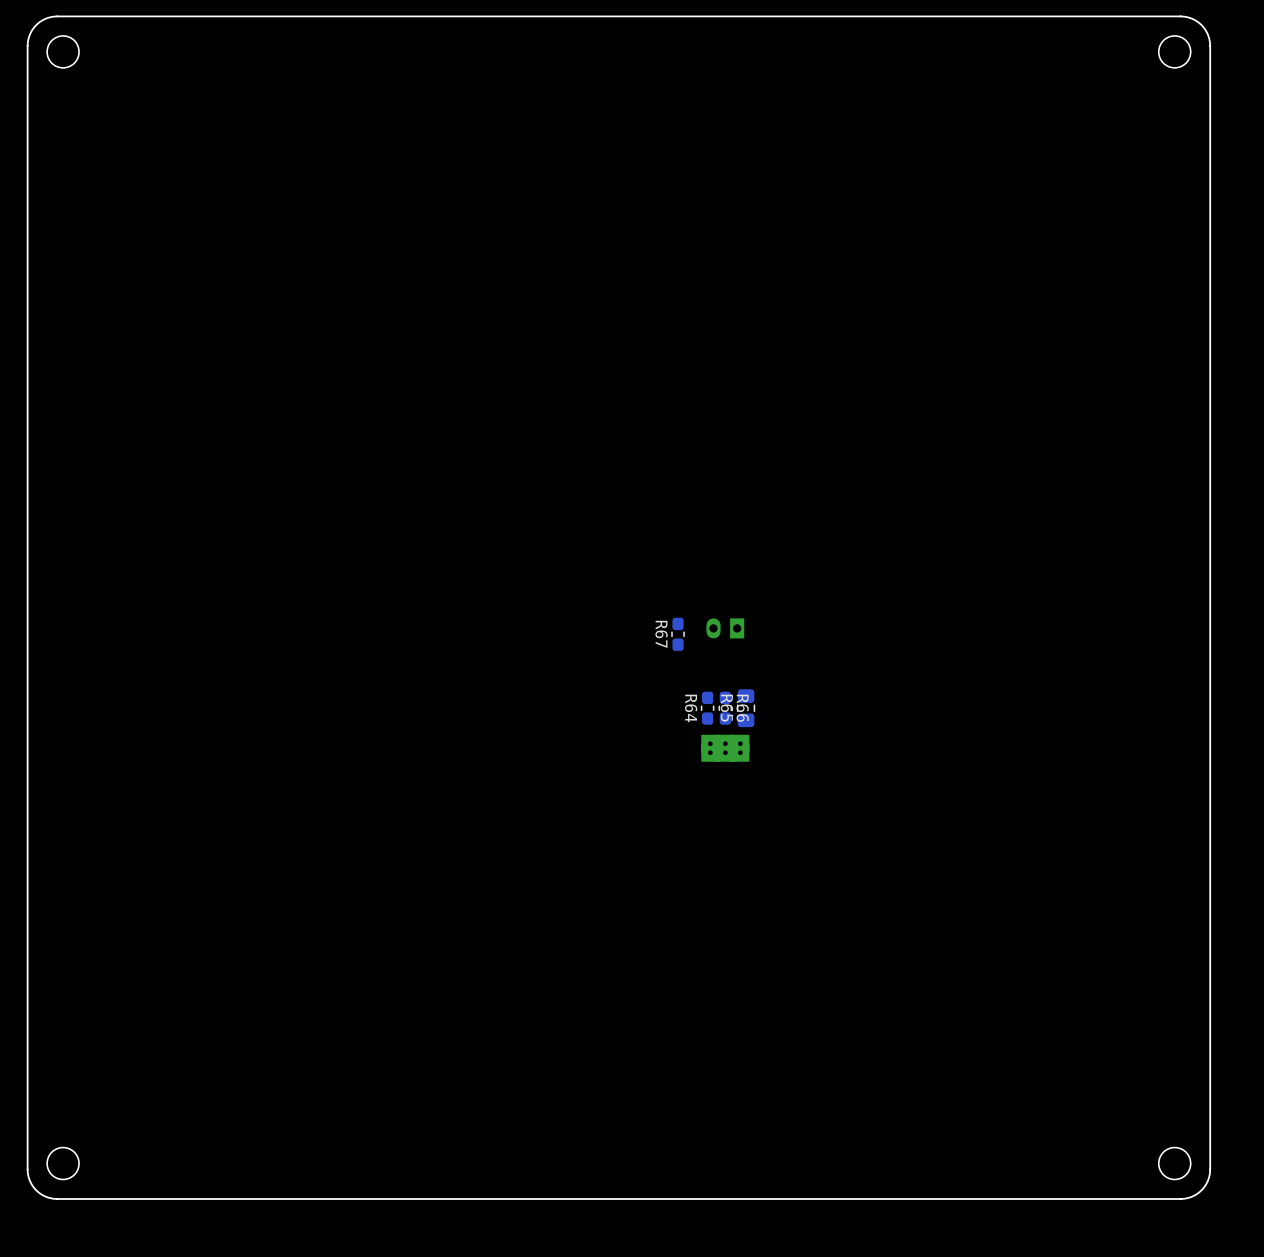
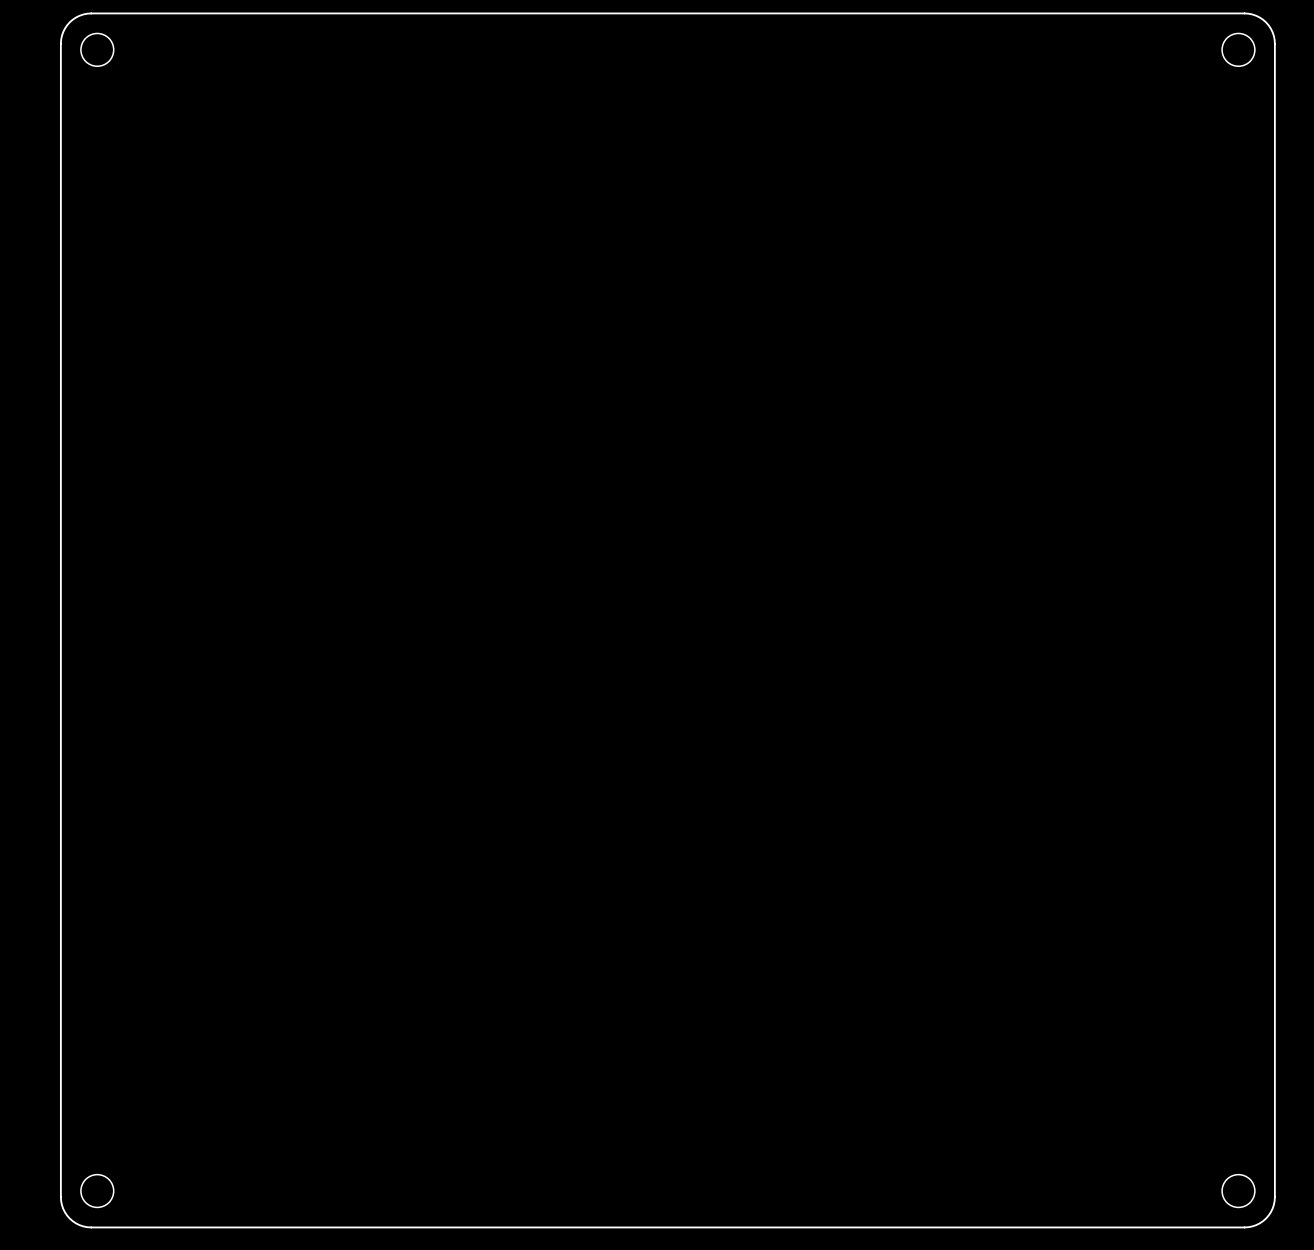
part: (725, 628) -> none
R67: (678, 634) -> none
R64: (707, 708) -> none
R66: (725, 708) -> none
R65: (746, 708) -> none
part: (725, 748) -> none

